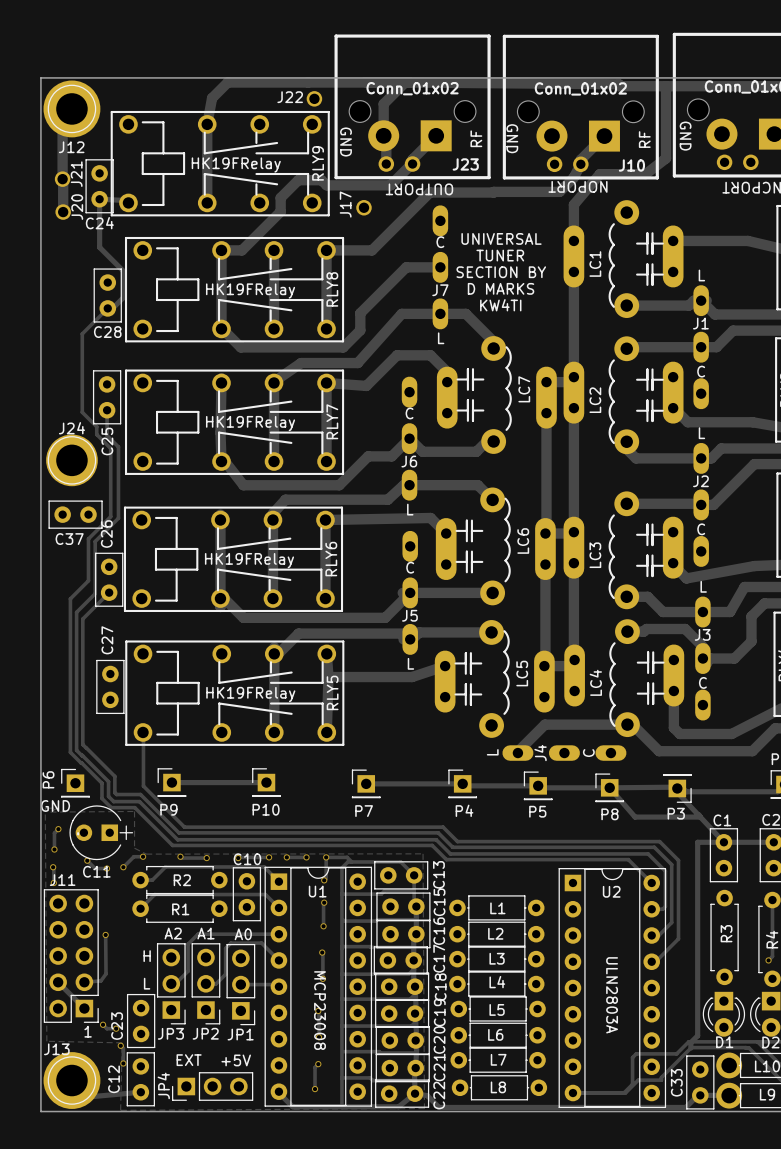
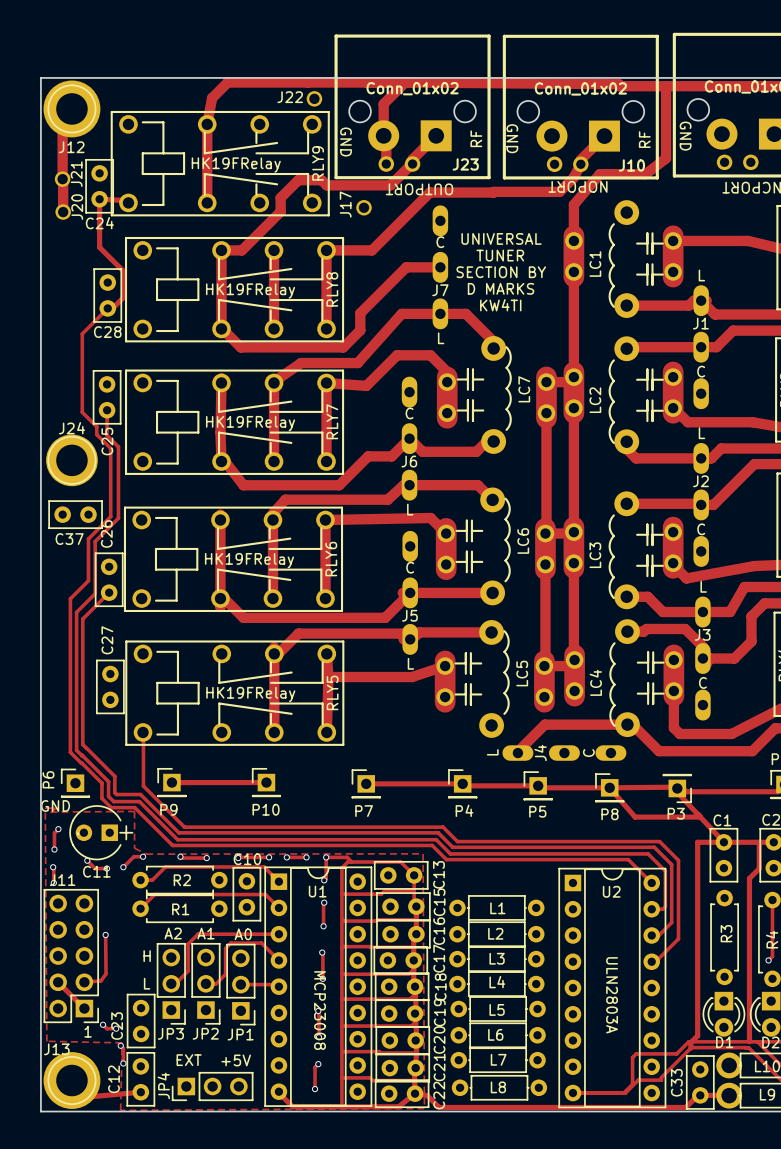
track: none -> (759, 842) (759, 868) (749, 878) (749, 1041)

